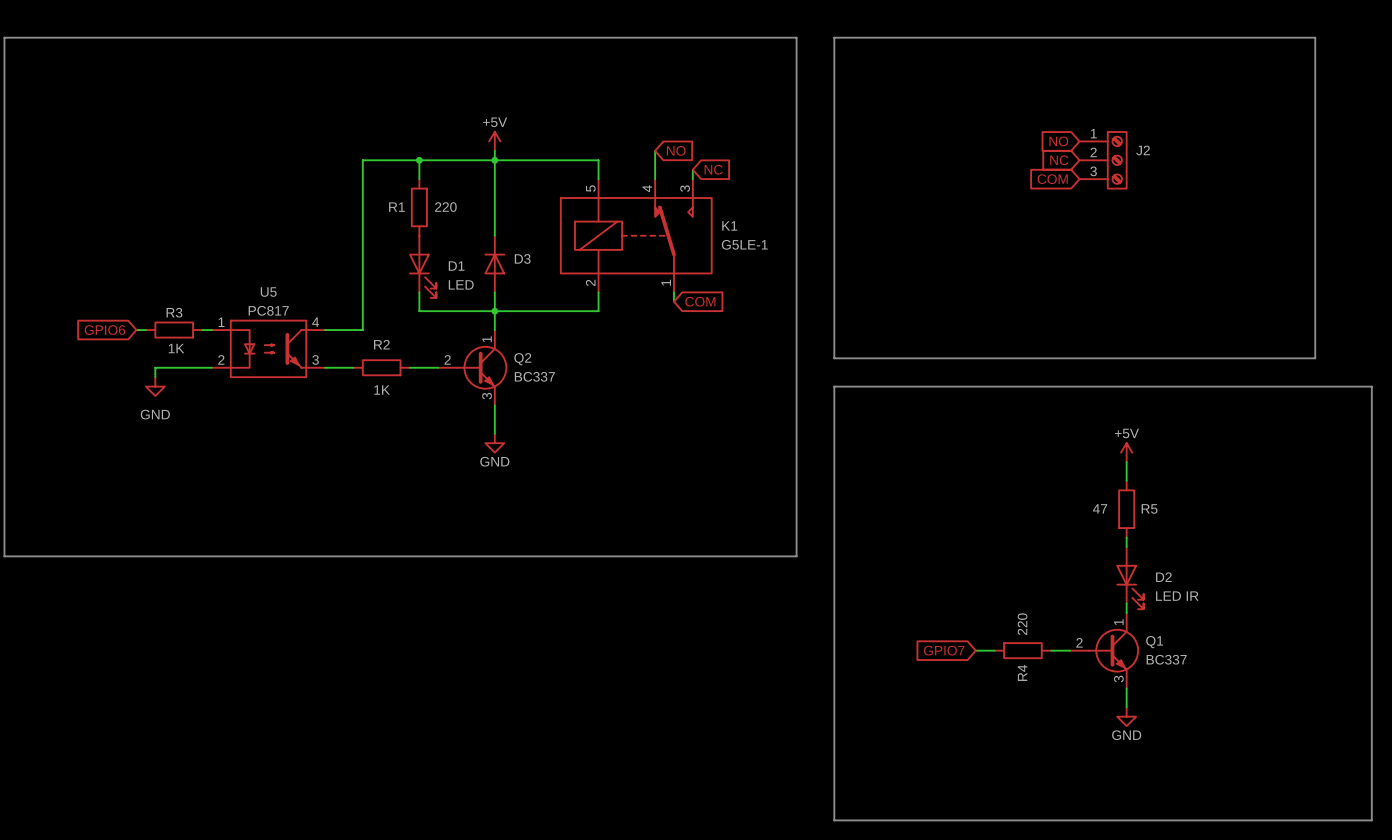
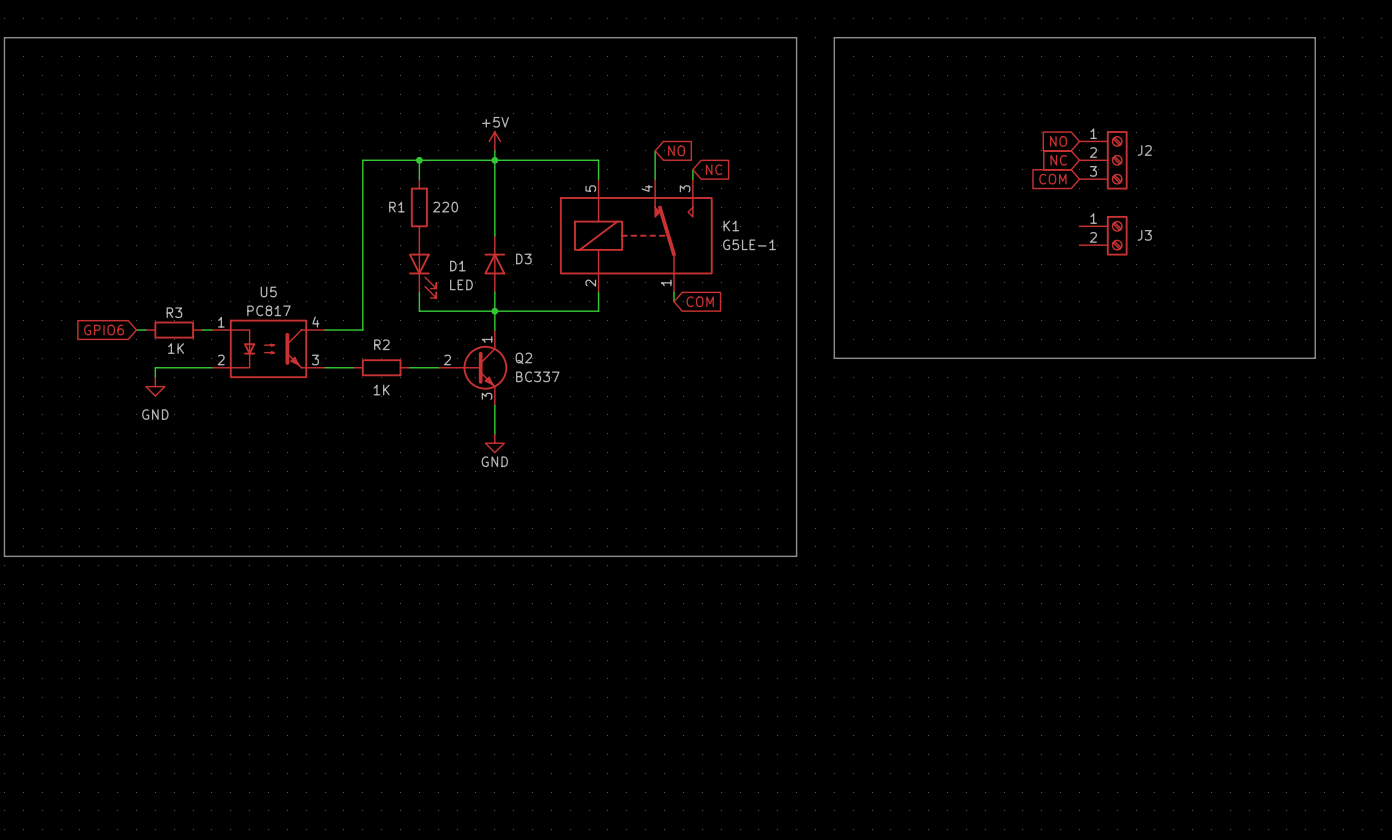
J3: none -> (1103, 235)
line: (834, 386) (1371, 386) (1371, 820) (834, 820) (834, 386) -> none
power symbol: +5V (1126, 452) -> none
wire: (1126, 462) (1126, 480) -> none
R5: 47 (1126, 509) -> none
wire: (1126, 537) (1126, 546) -> none
D2: LED IR (1129, 578) -> none
wire: (1126, 603) (1126, 612) -> none
global label: GPIO7 (944, 650) -> none
wire: (975, 650) (994, 650) -> none
R4: 220 (1022, 650) -> none
wire: (1051, 650) (1070, 650) -> none
Q1: BC337 (1104, 650) -> none
wire: (1126, 688) (1126, 707) -> none
power symbol: GND (1126, 716) -> none

